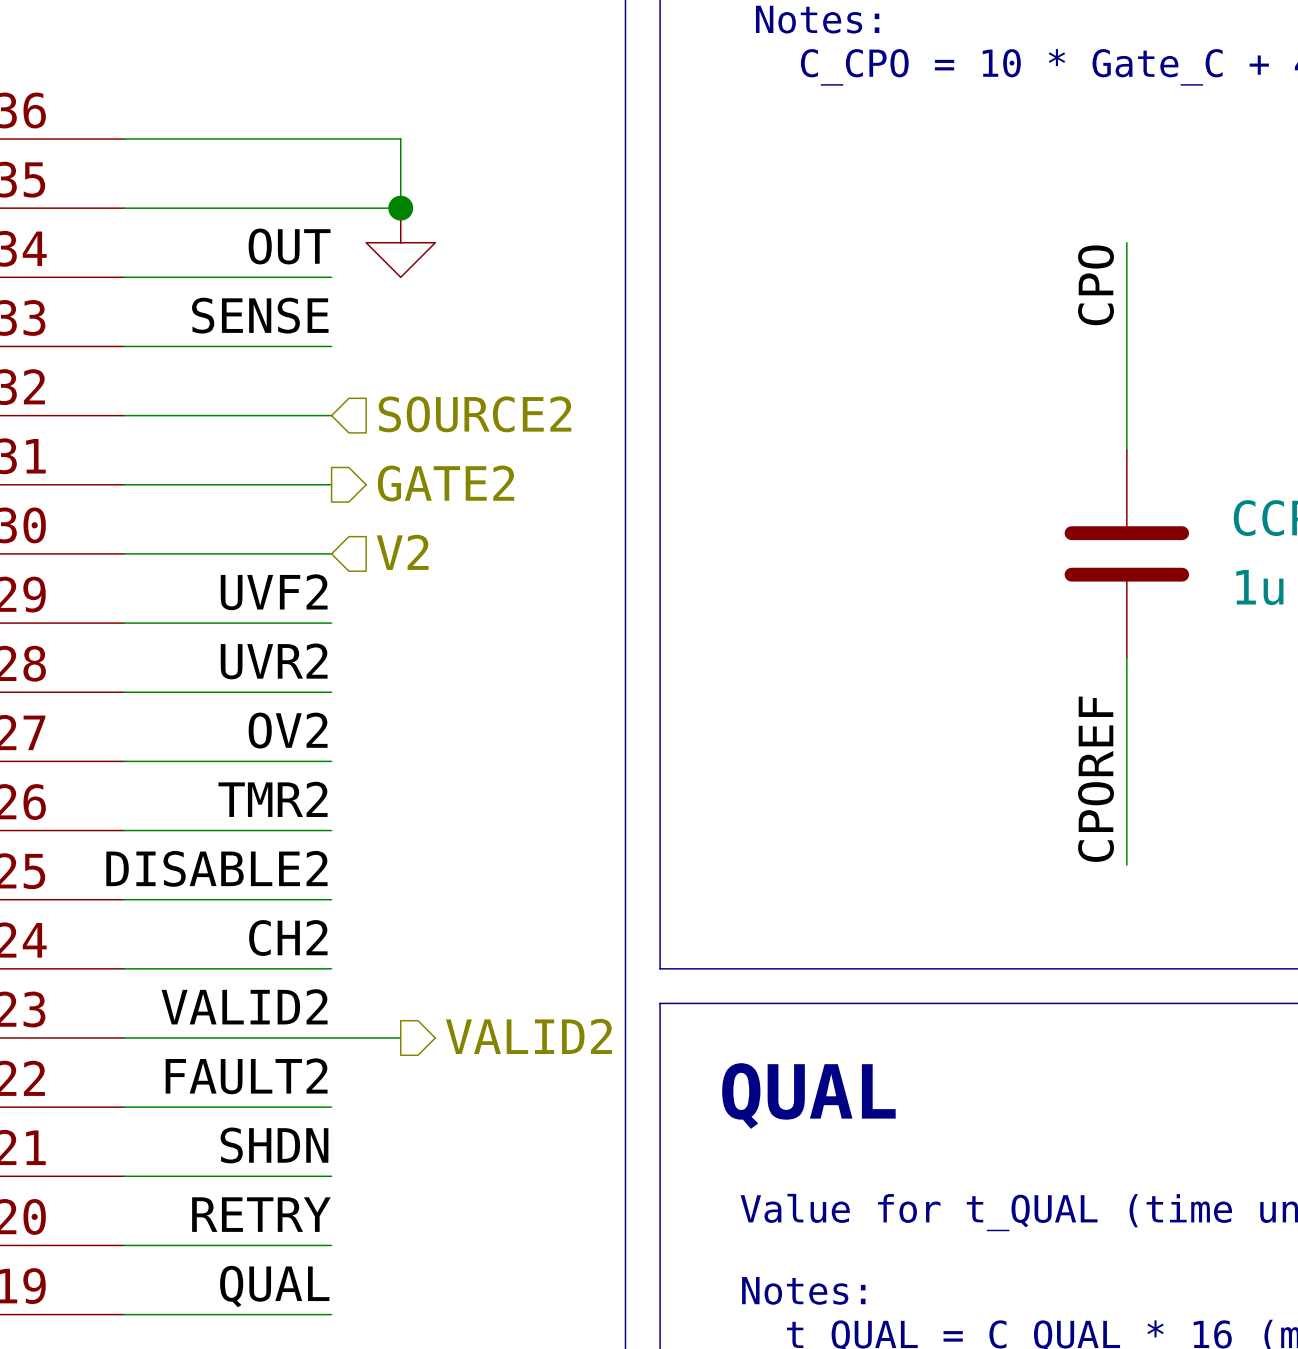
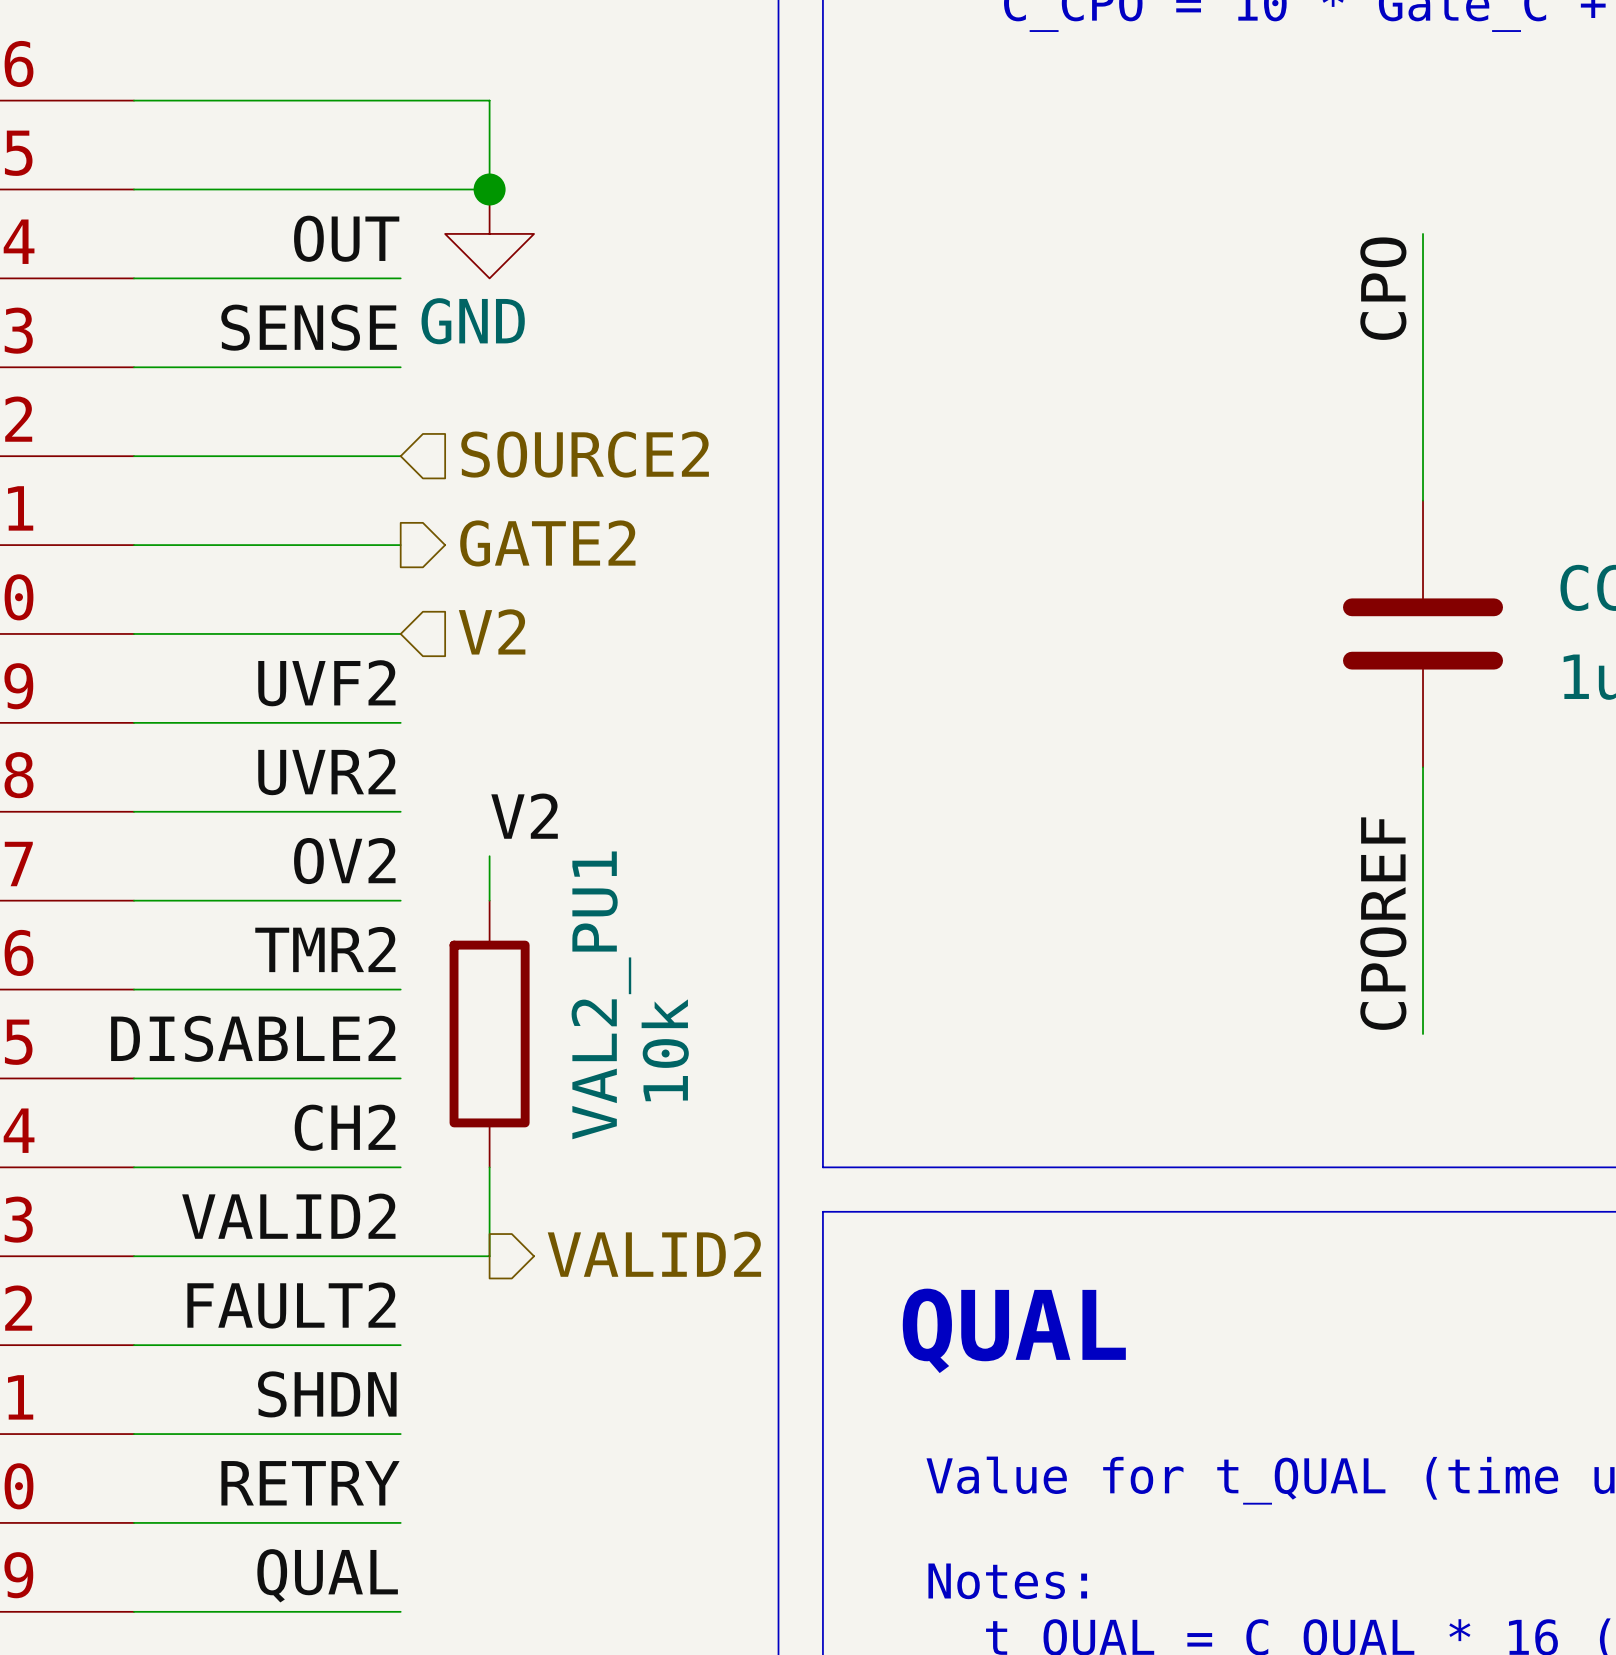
power symbol text: none -> GND (473, 321)
label: none -> V2 (524, 816)
wire: none -> (489, 856) (489, 900)
VAL2_PU1: none -> 10k (489, 1034)
wire: none -> (489, 1167) (489, 1256)

